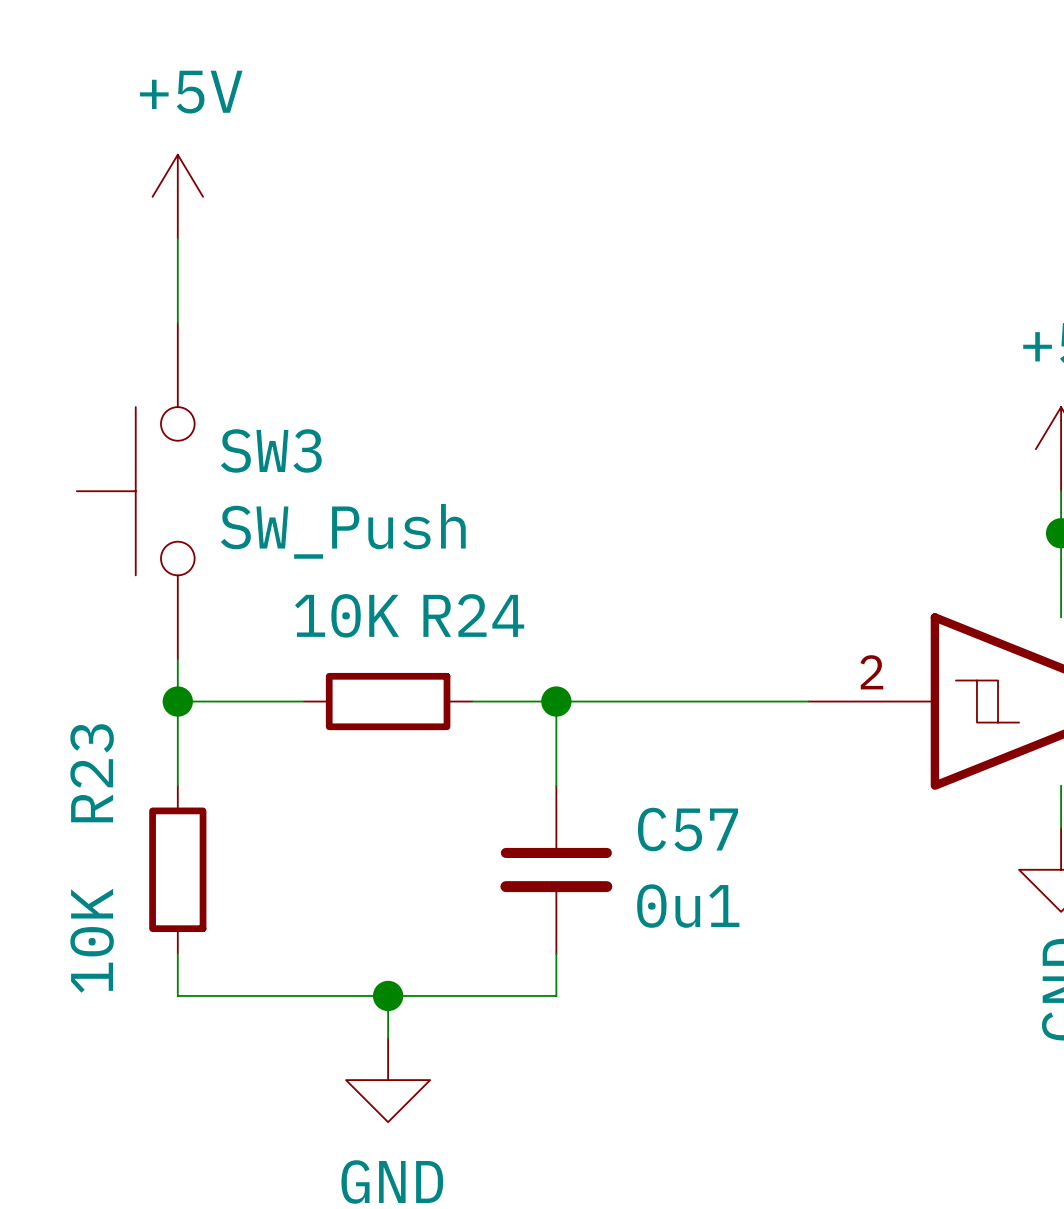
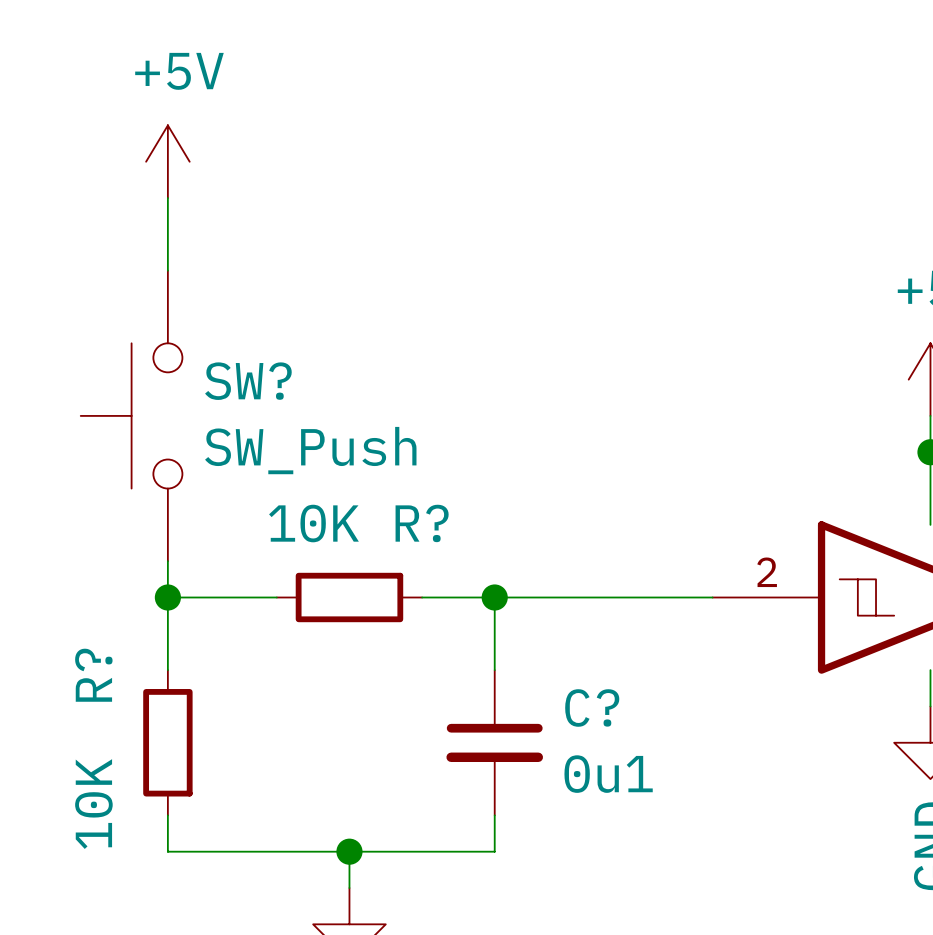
SW3 name: SW3 (271, 450) -> SW? (248, 381)
R24 name: R24 (473, 615) -> R? (422, 523)
R23 name: R23 (92, 773) -> R? (93, 675)
C57 name: C57 (688, 829) -> C? (592, 707)

